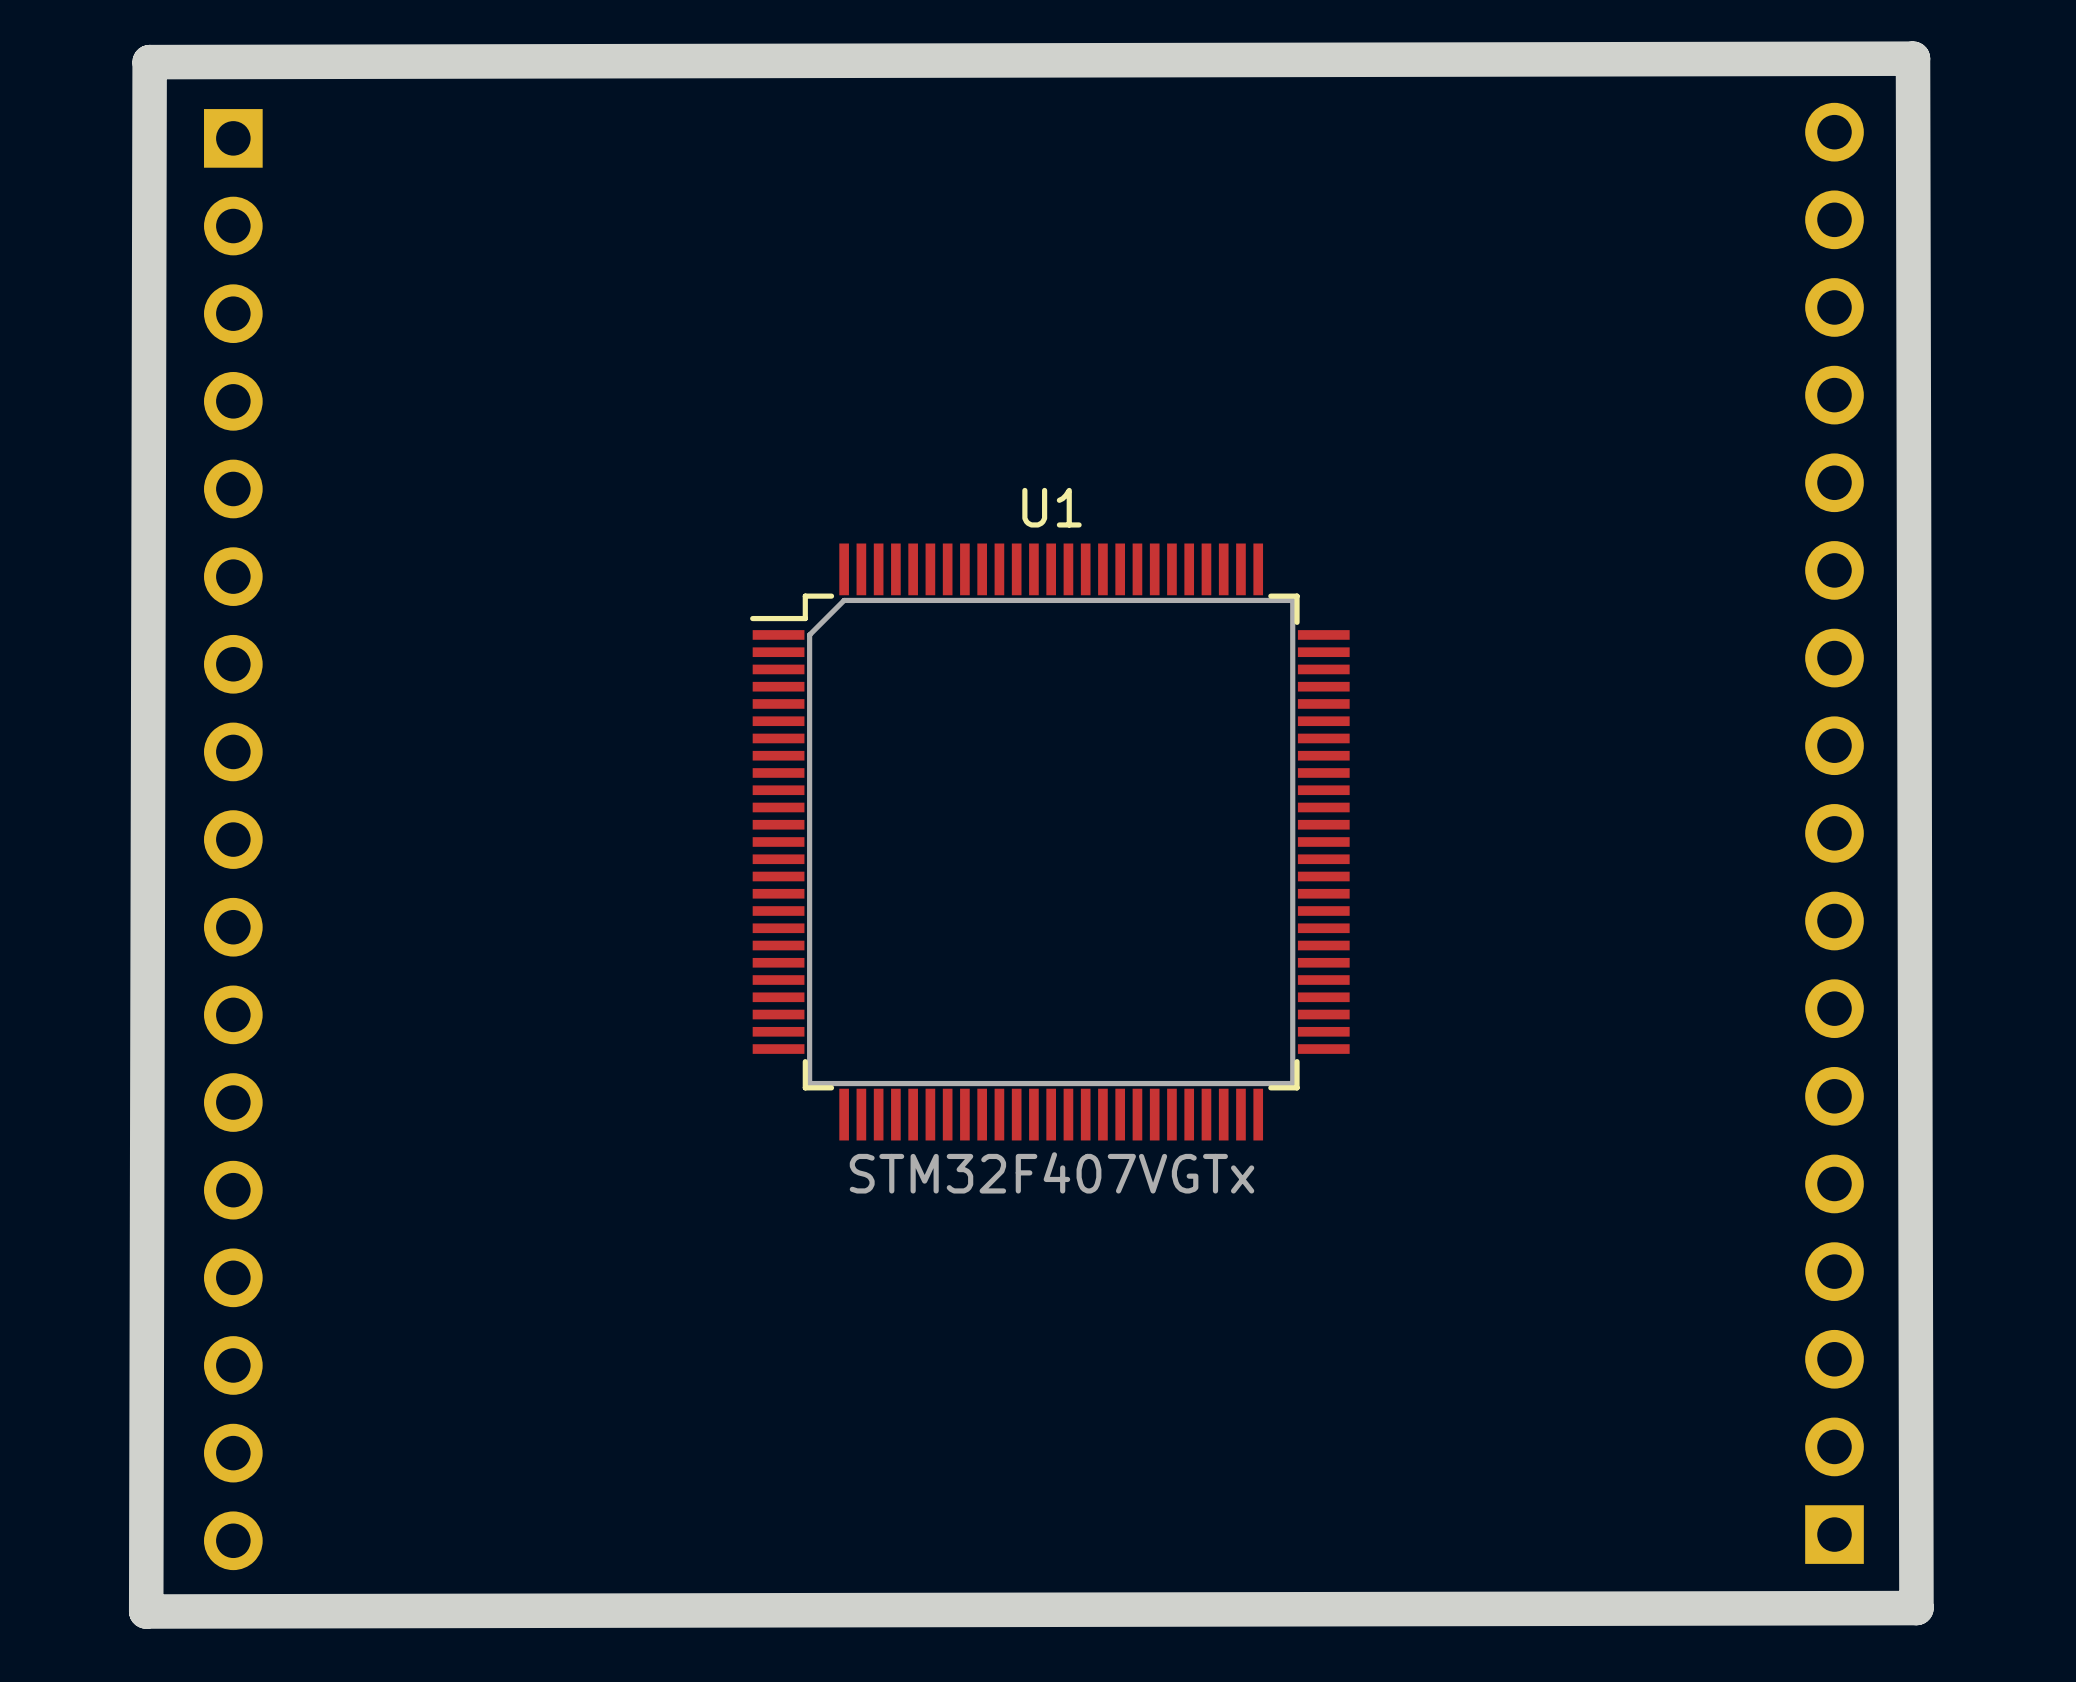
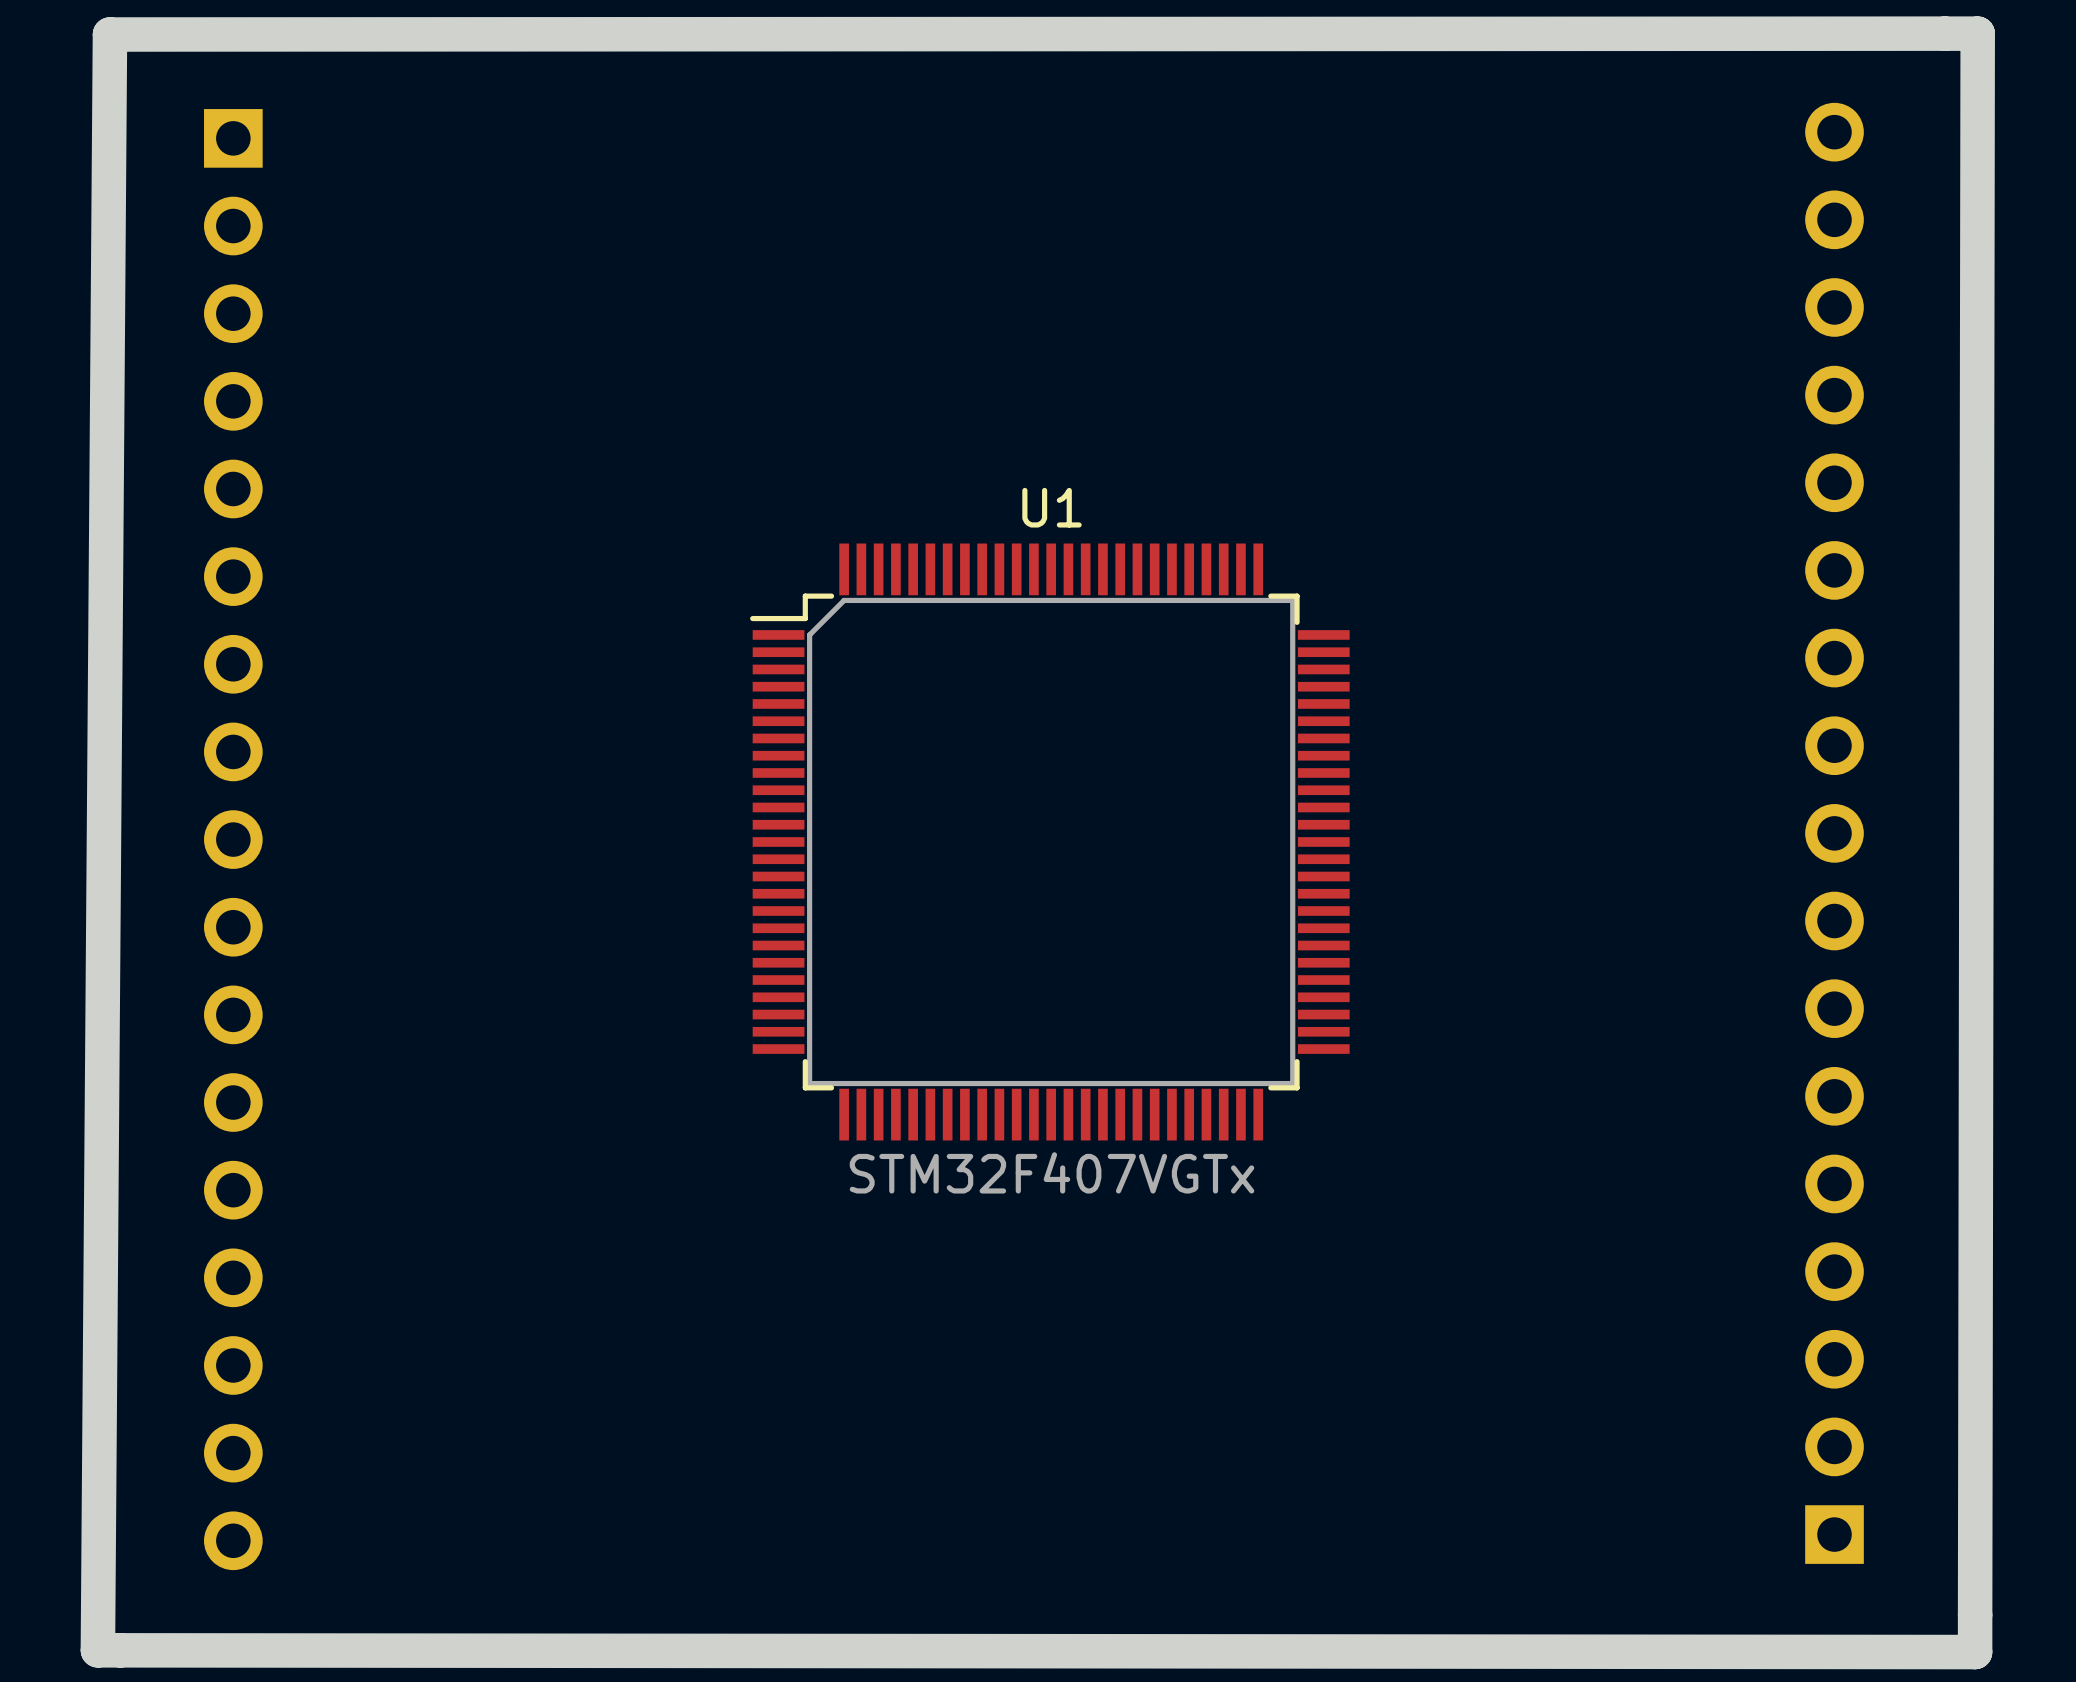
board edge: (1913, 58) (1916, 1608) (146, 1611) (149, 62) (1913, 58) -> (1944, 33) (109, 34) (97, 1650) (1975, 1652) (1977, 33) (1944, 33)

